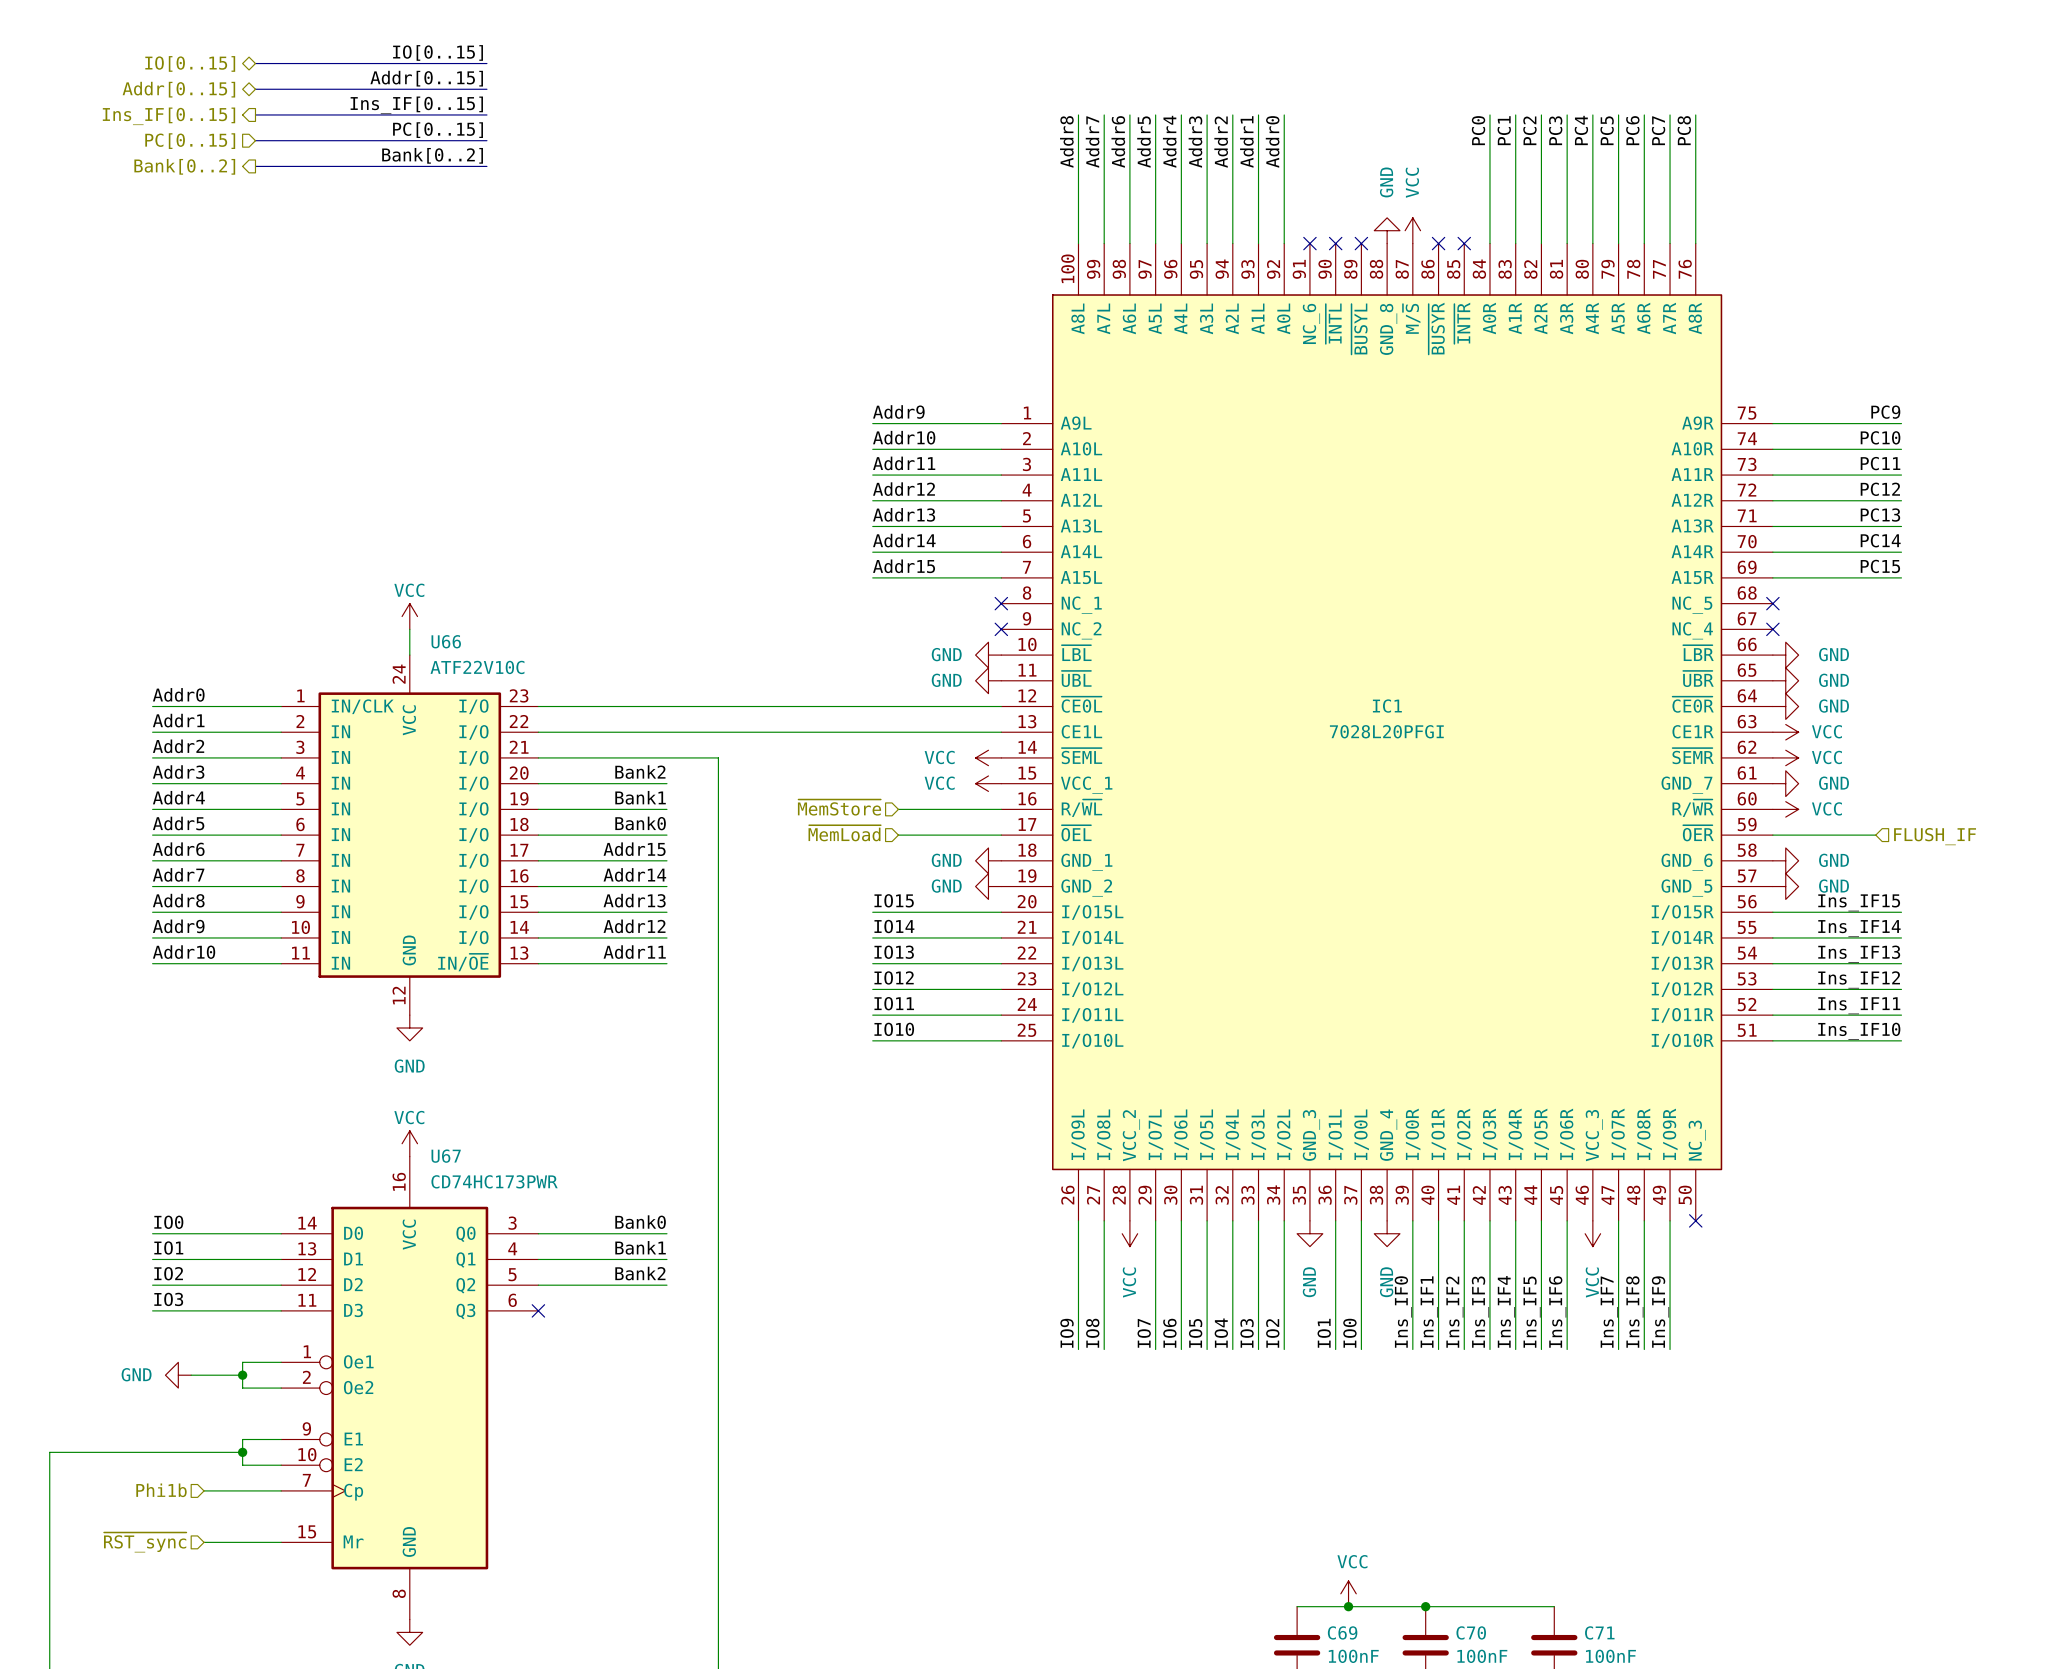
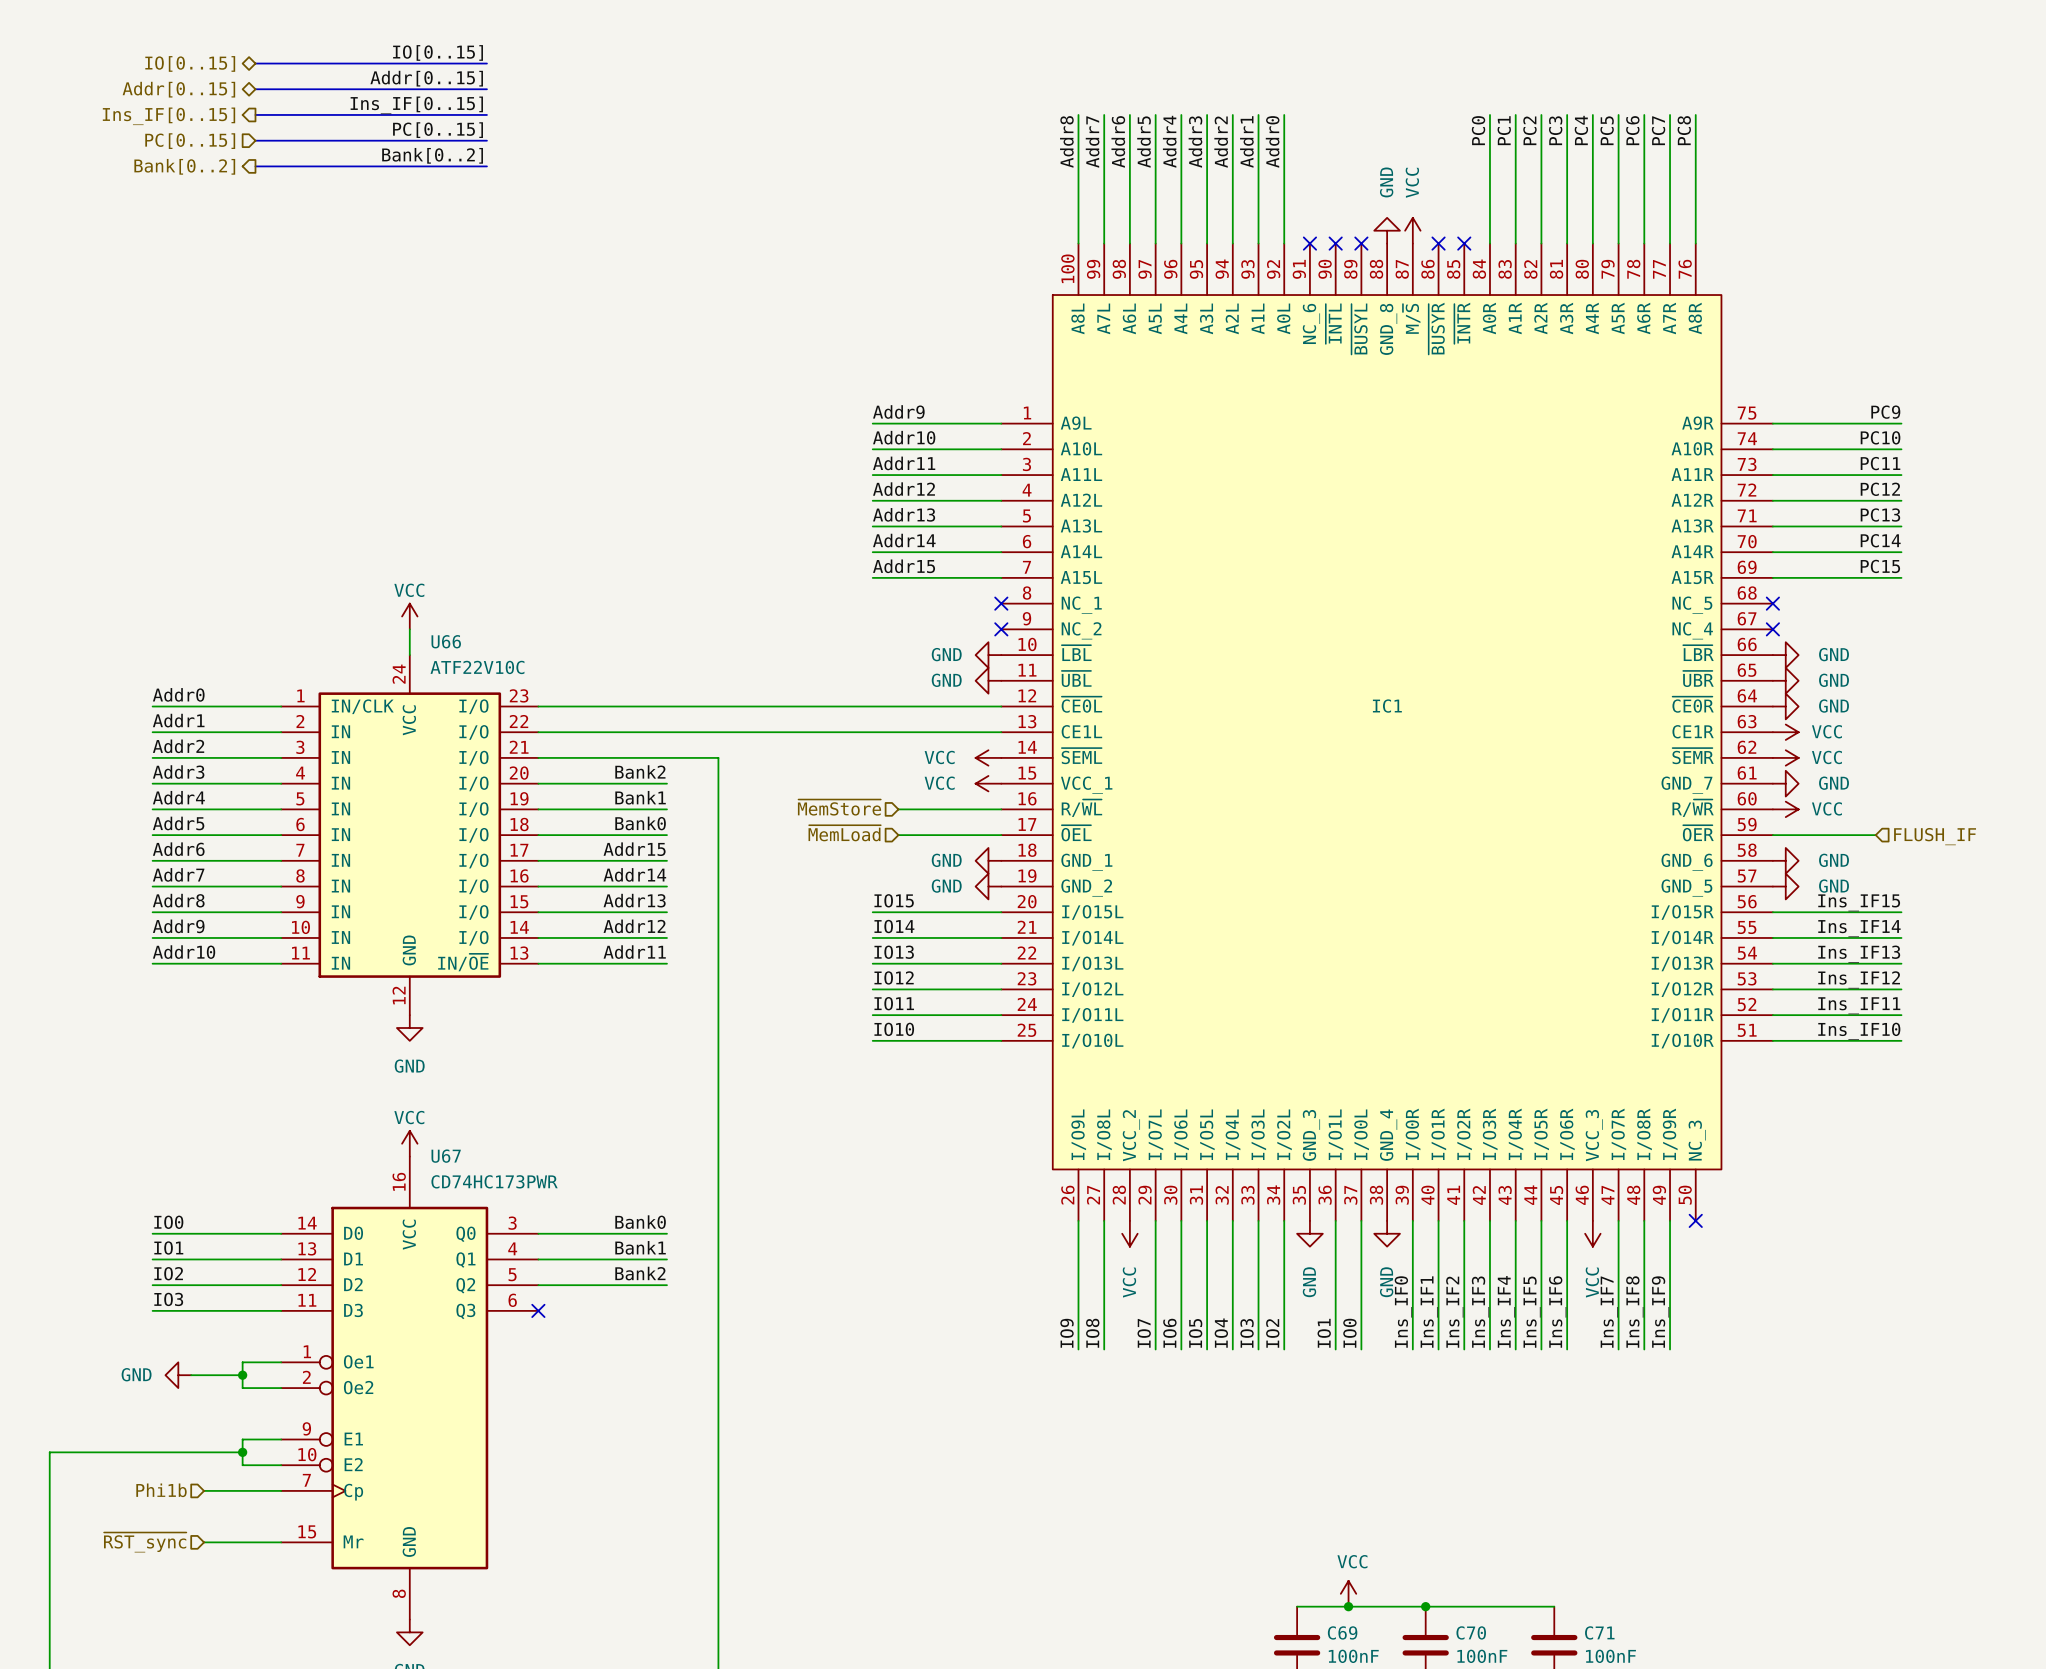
IC1 value: 7028L20PFGI (1386, 731) -> none

